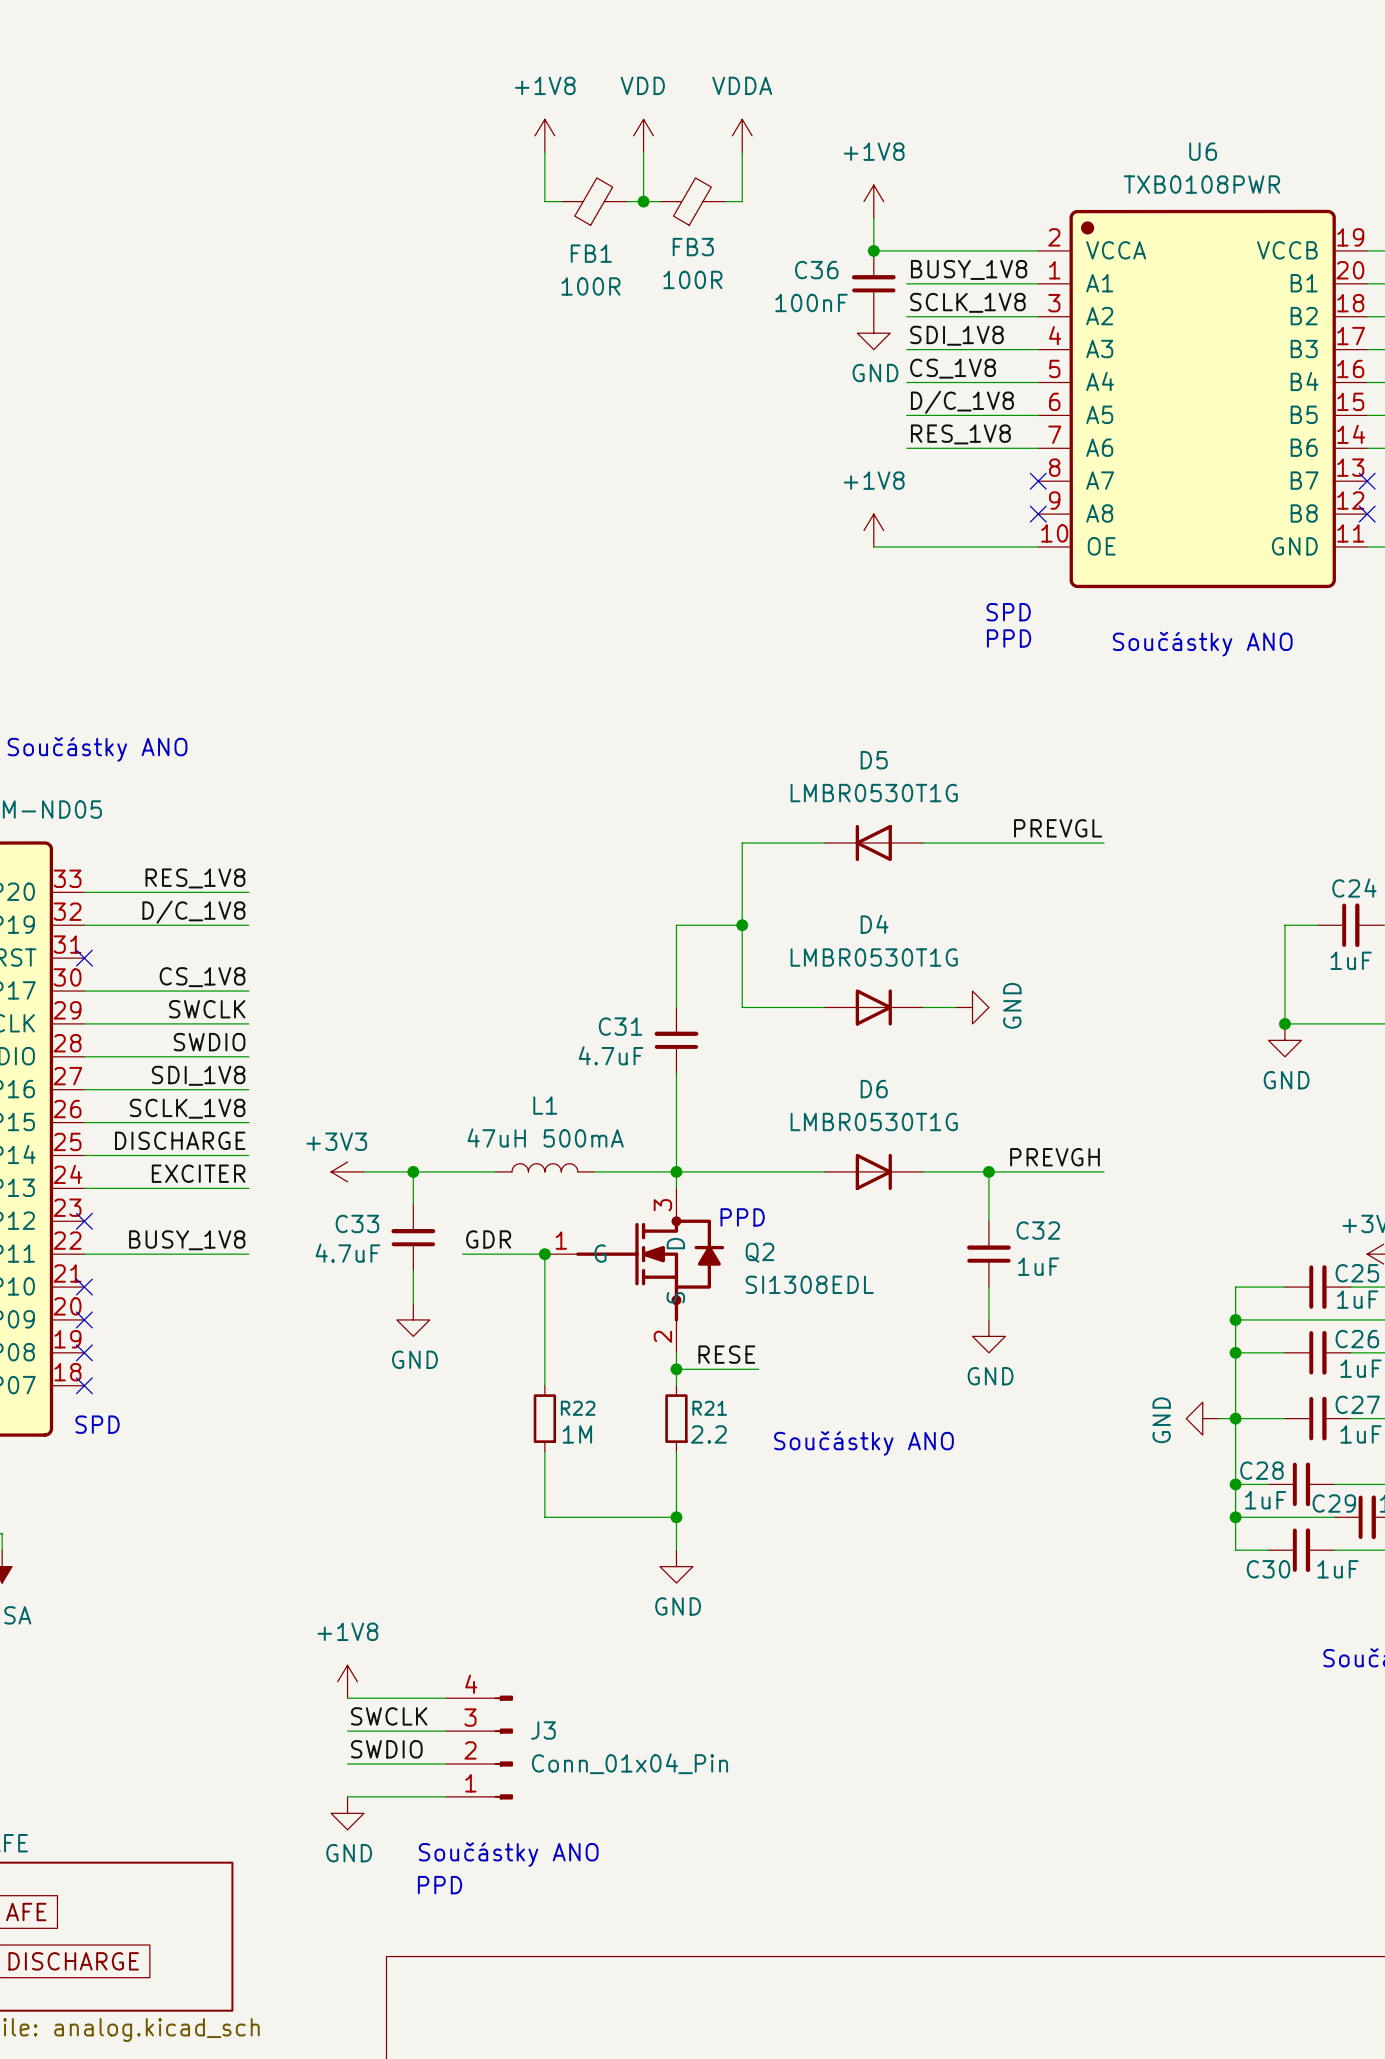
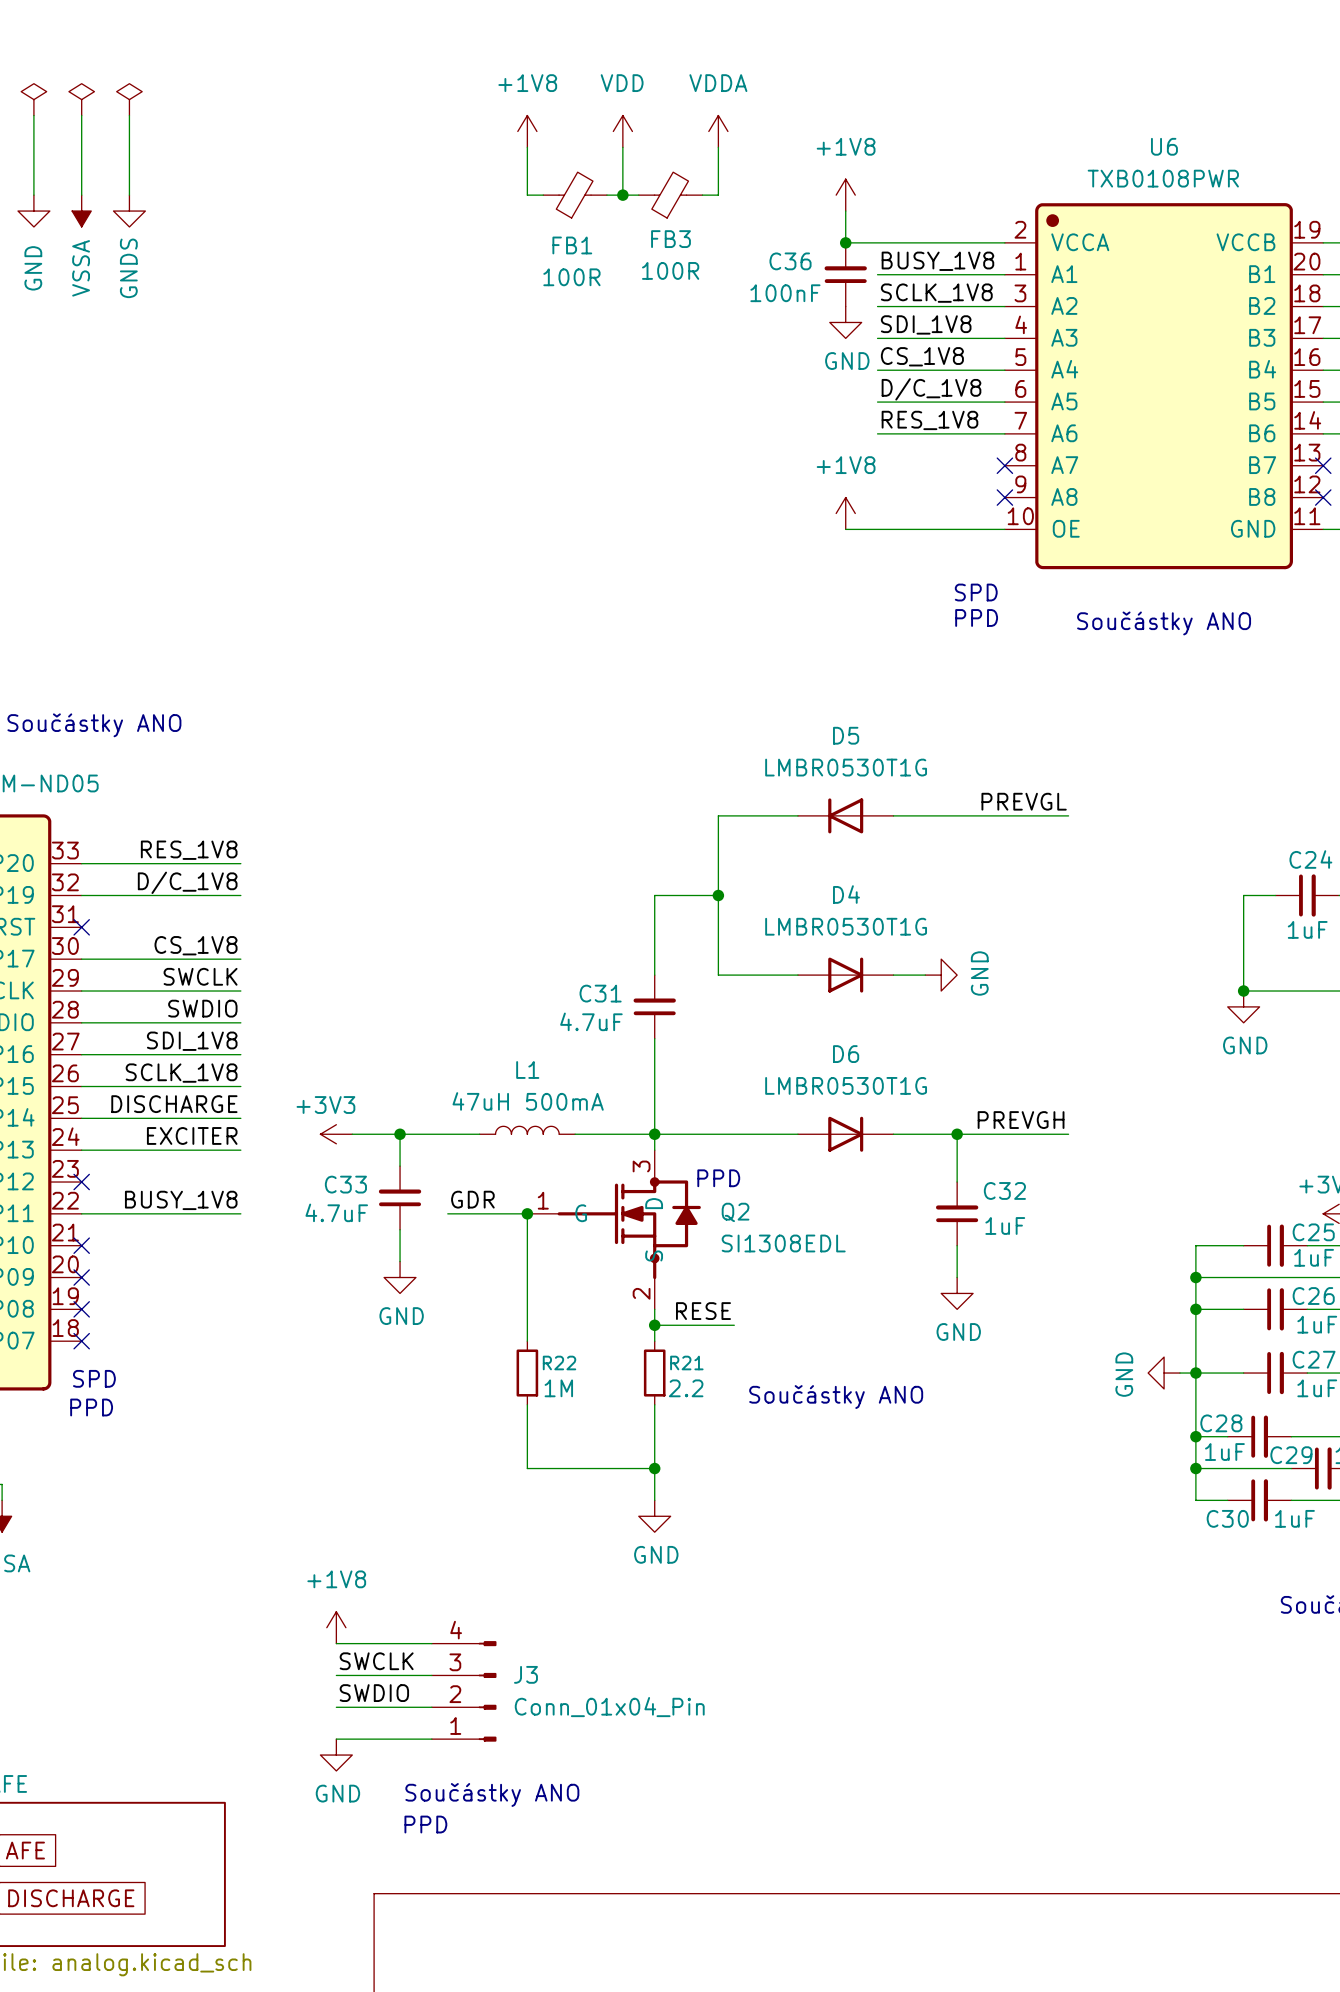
power symbol: none -> (33, 99)
power symbol: none -> (81, 99)
power symbol: none -> (129, 99)
wire: none -> (33, 115) (33, 195)
wire: none -> (81, 115) (81, 195)
wire: none -> (129, 115) (129, 195)
power symbol: none -> GND (33, 211)
power symbol: none -> VSSA (81, 211)
power symbol: none -> GNDS (129, 211)
text: none -> PPD (91, 1407)

